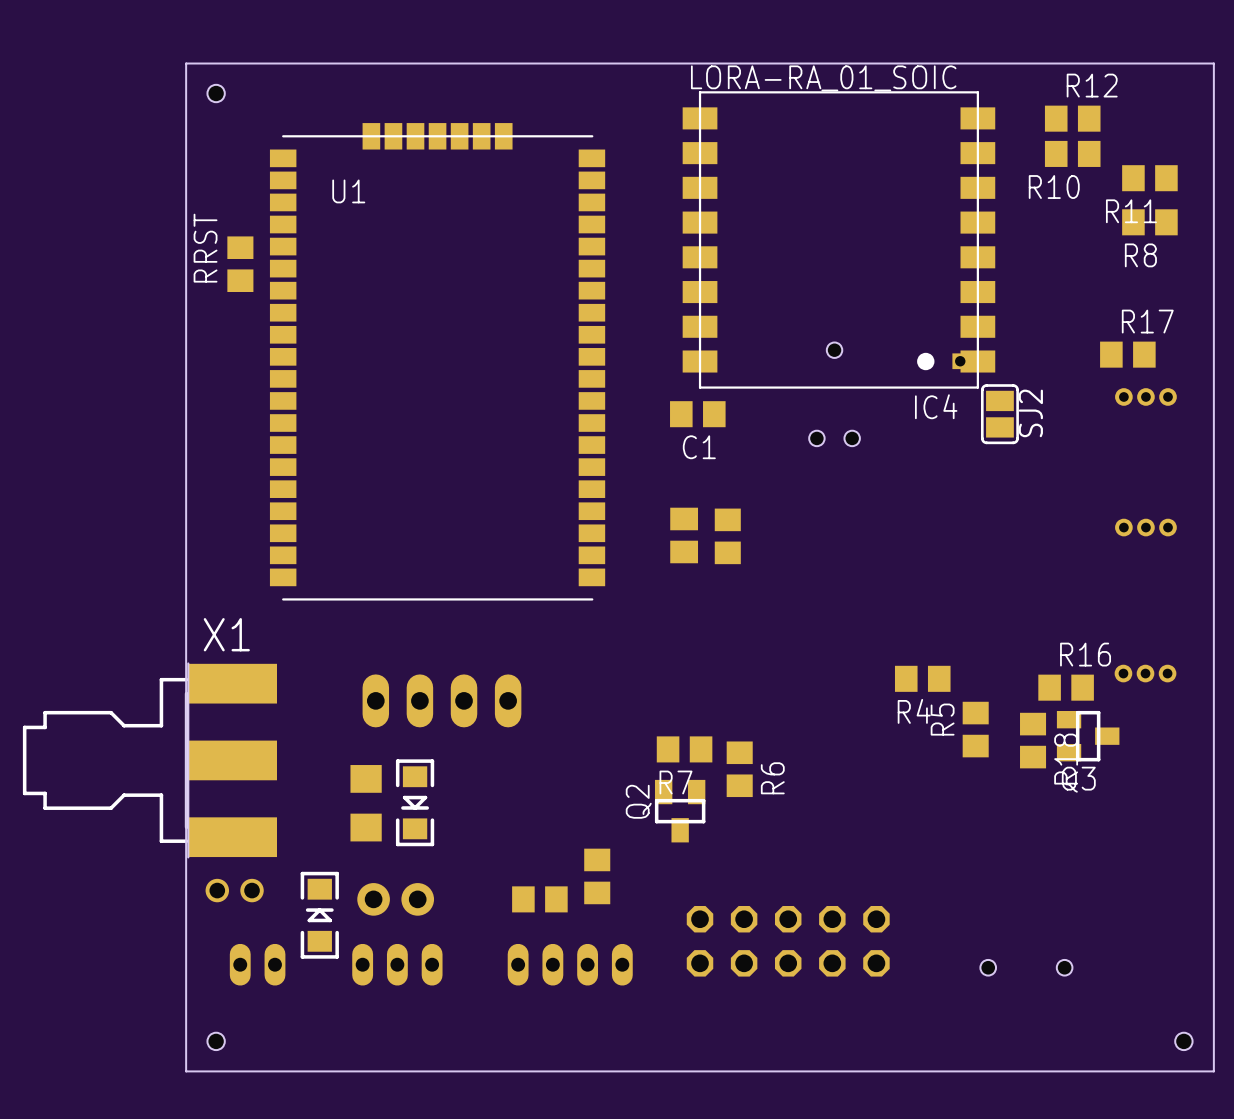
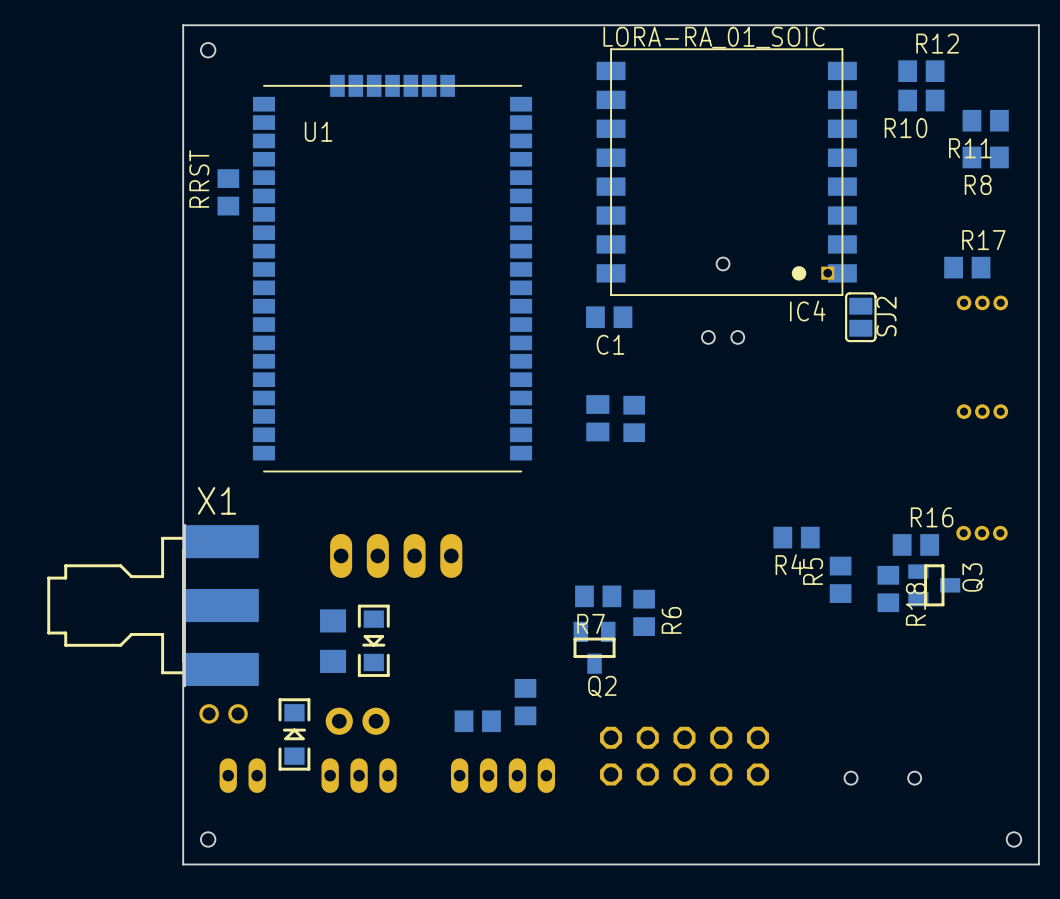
Q3 name rotation: 0° (1078, 779) -> 90° counterclockwise (973, 577)
Q3 name position: Q3 (1078, 779) -> Q3 (973, 577)
Q2 name rotation: 0° (638, 801) -> 90° clockwise (602, 686)
Q2 name position: Q2 (638, 801) -> Q2 (602, 686)

